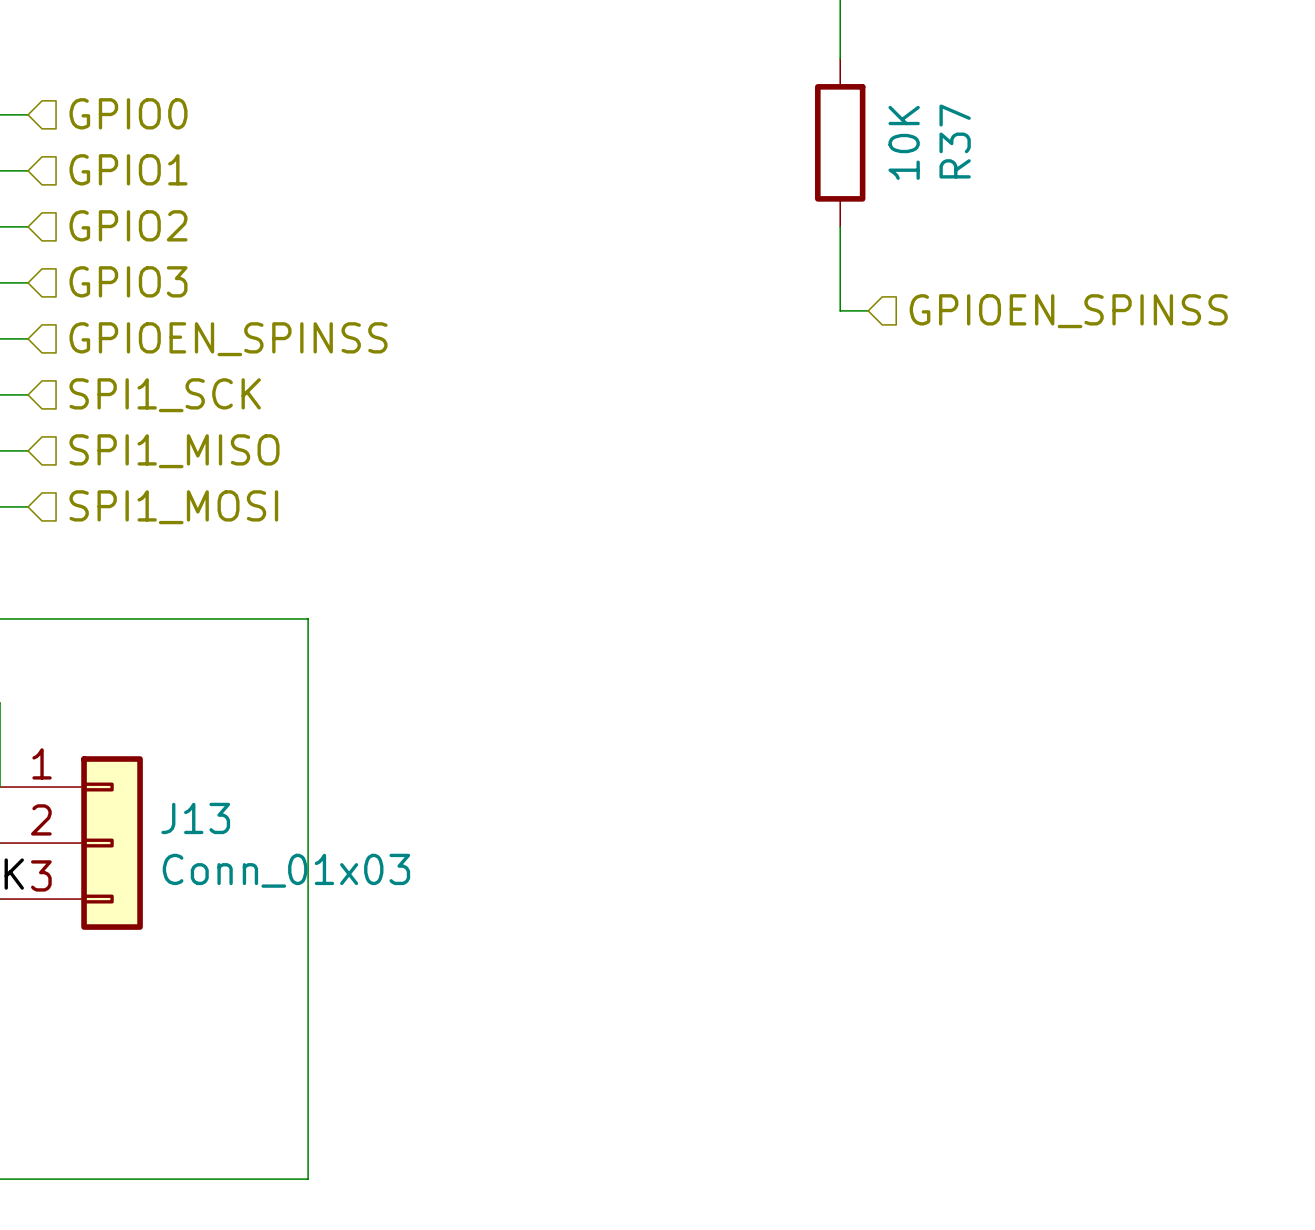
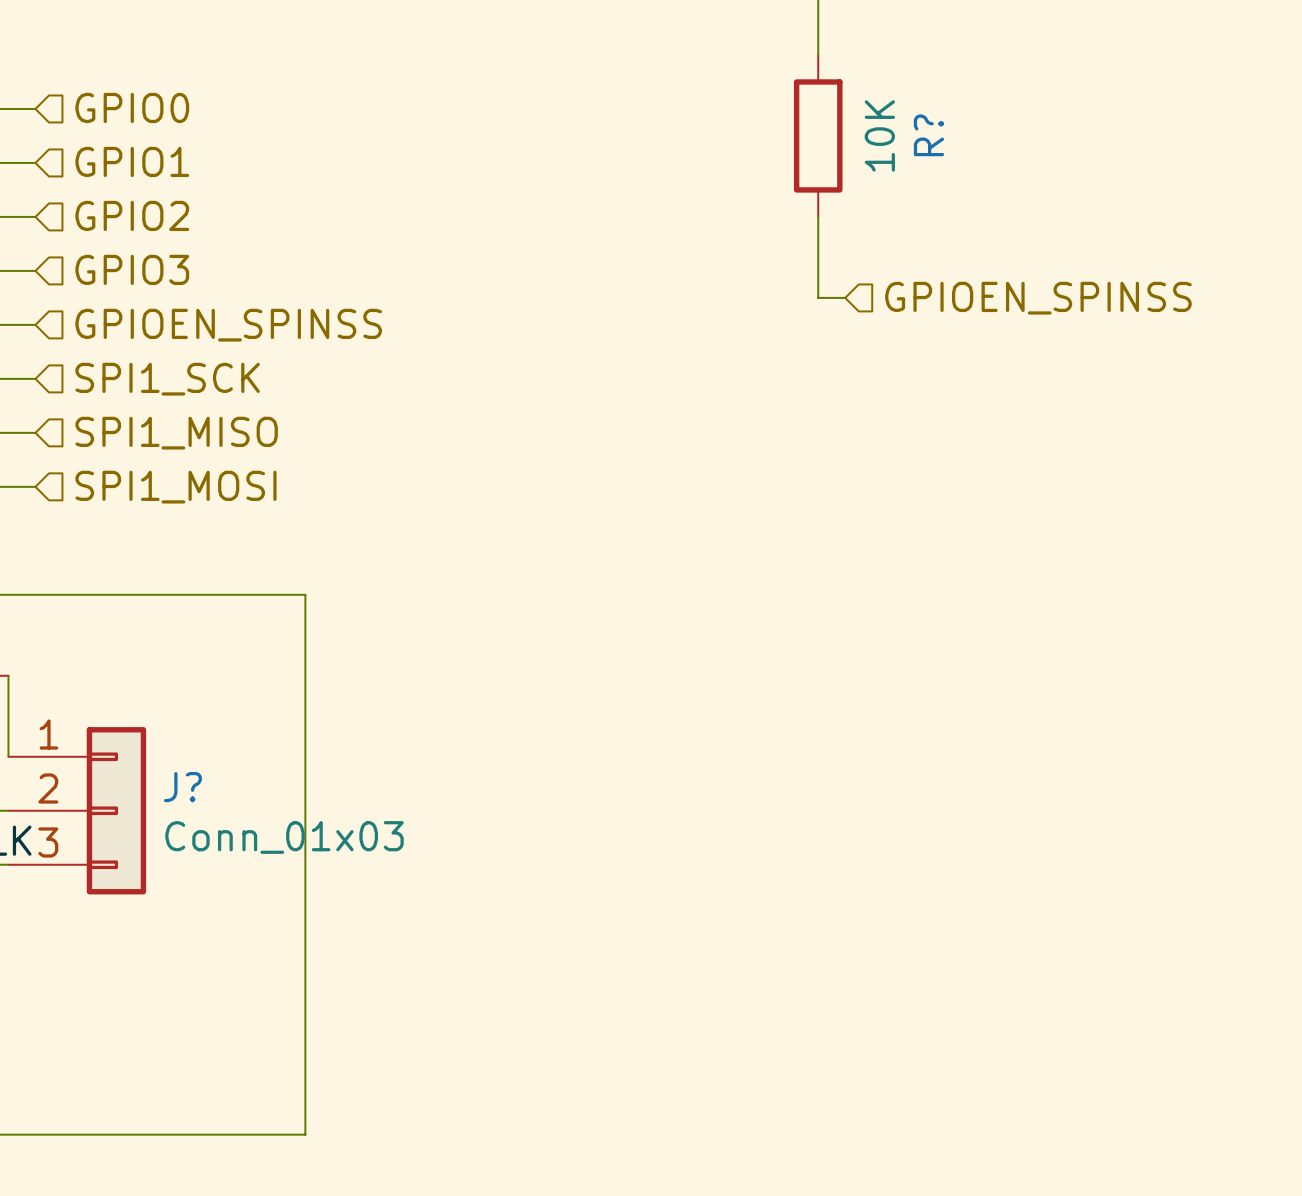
R37 name: R37 (955, 141) -> R? (928, 135)
J13 name: J13 (195, 818) -> J? (182, 787)

